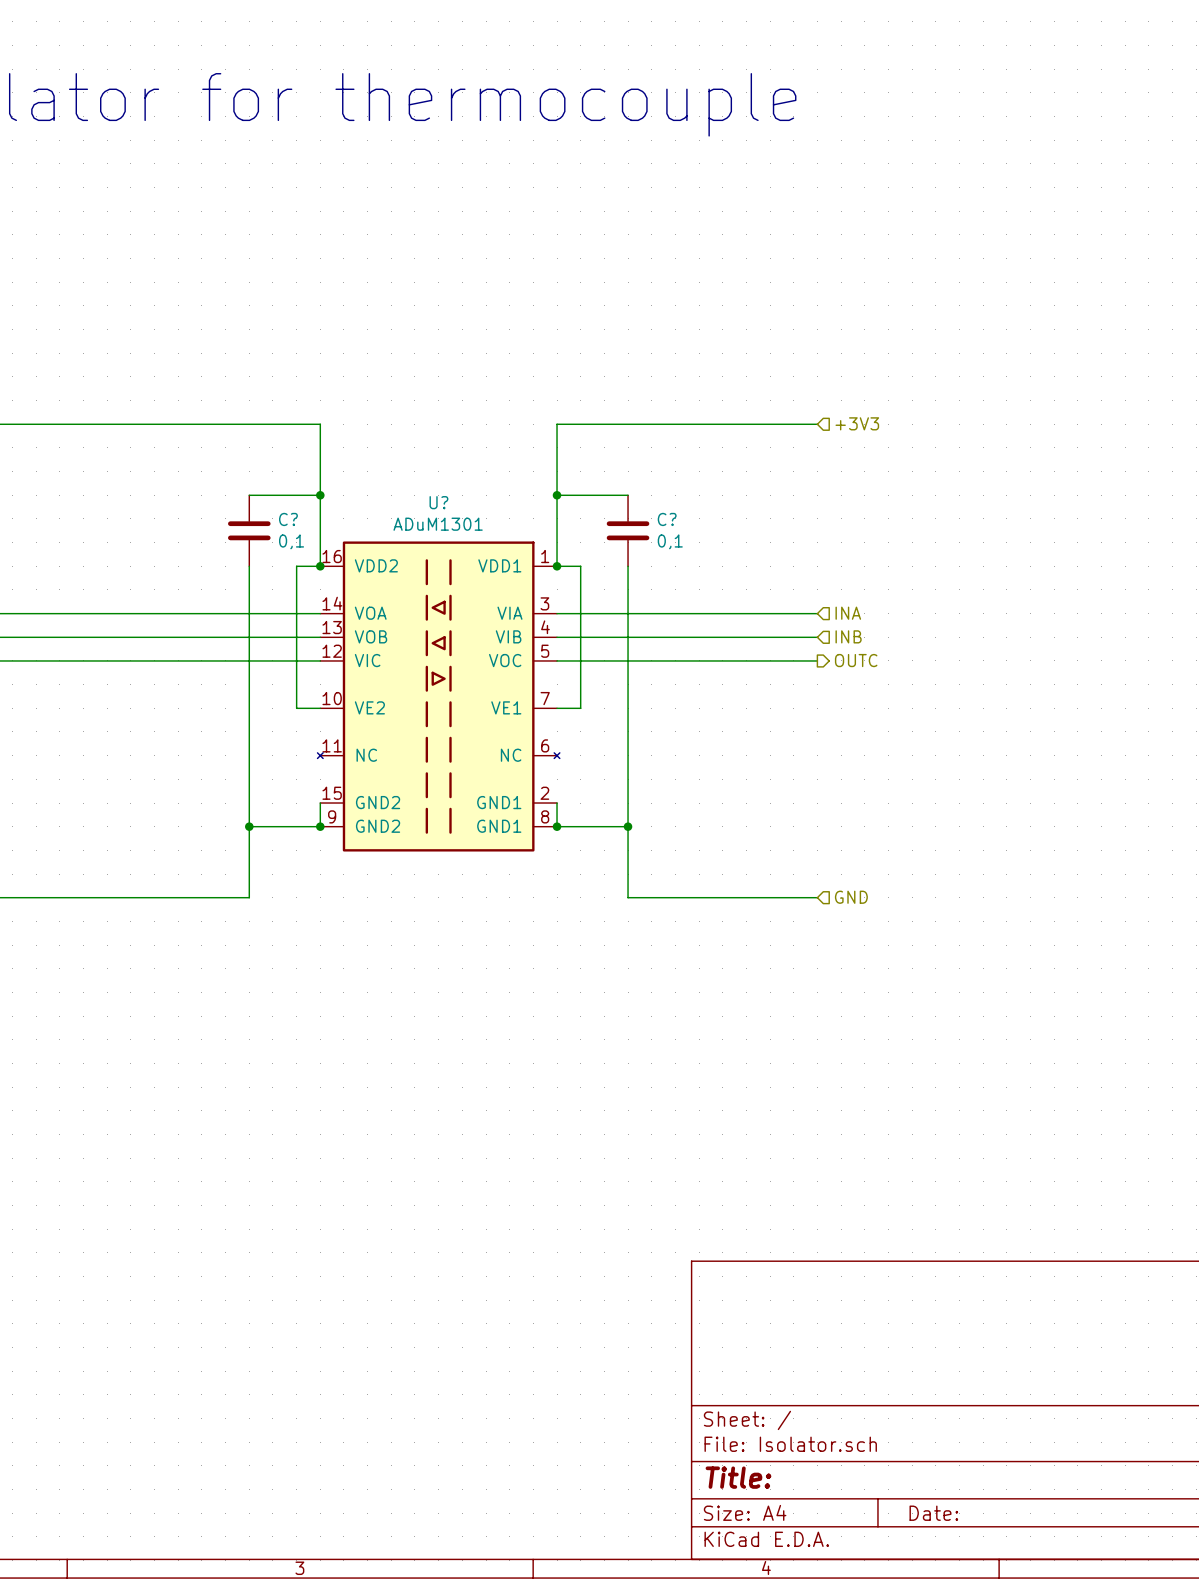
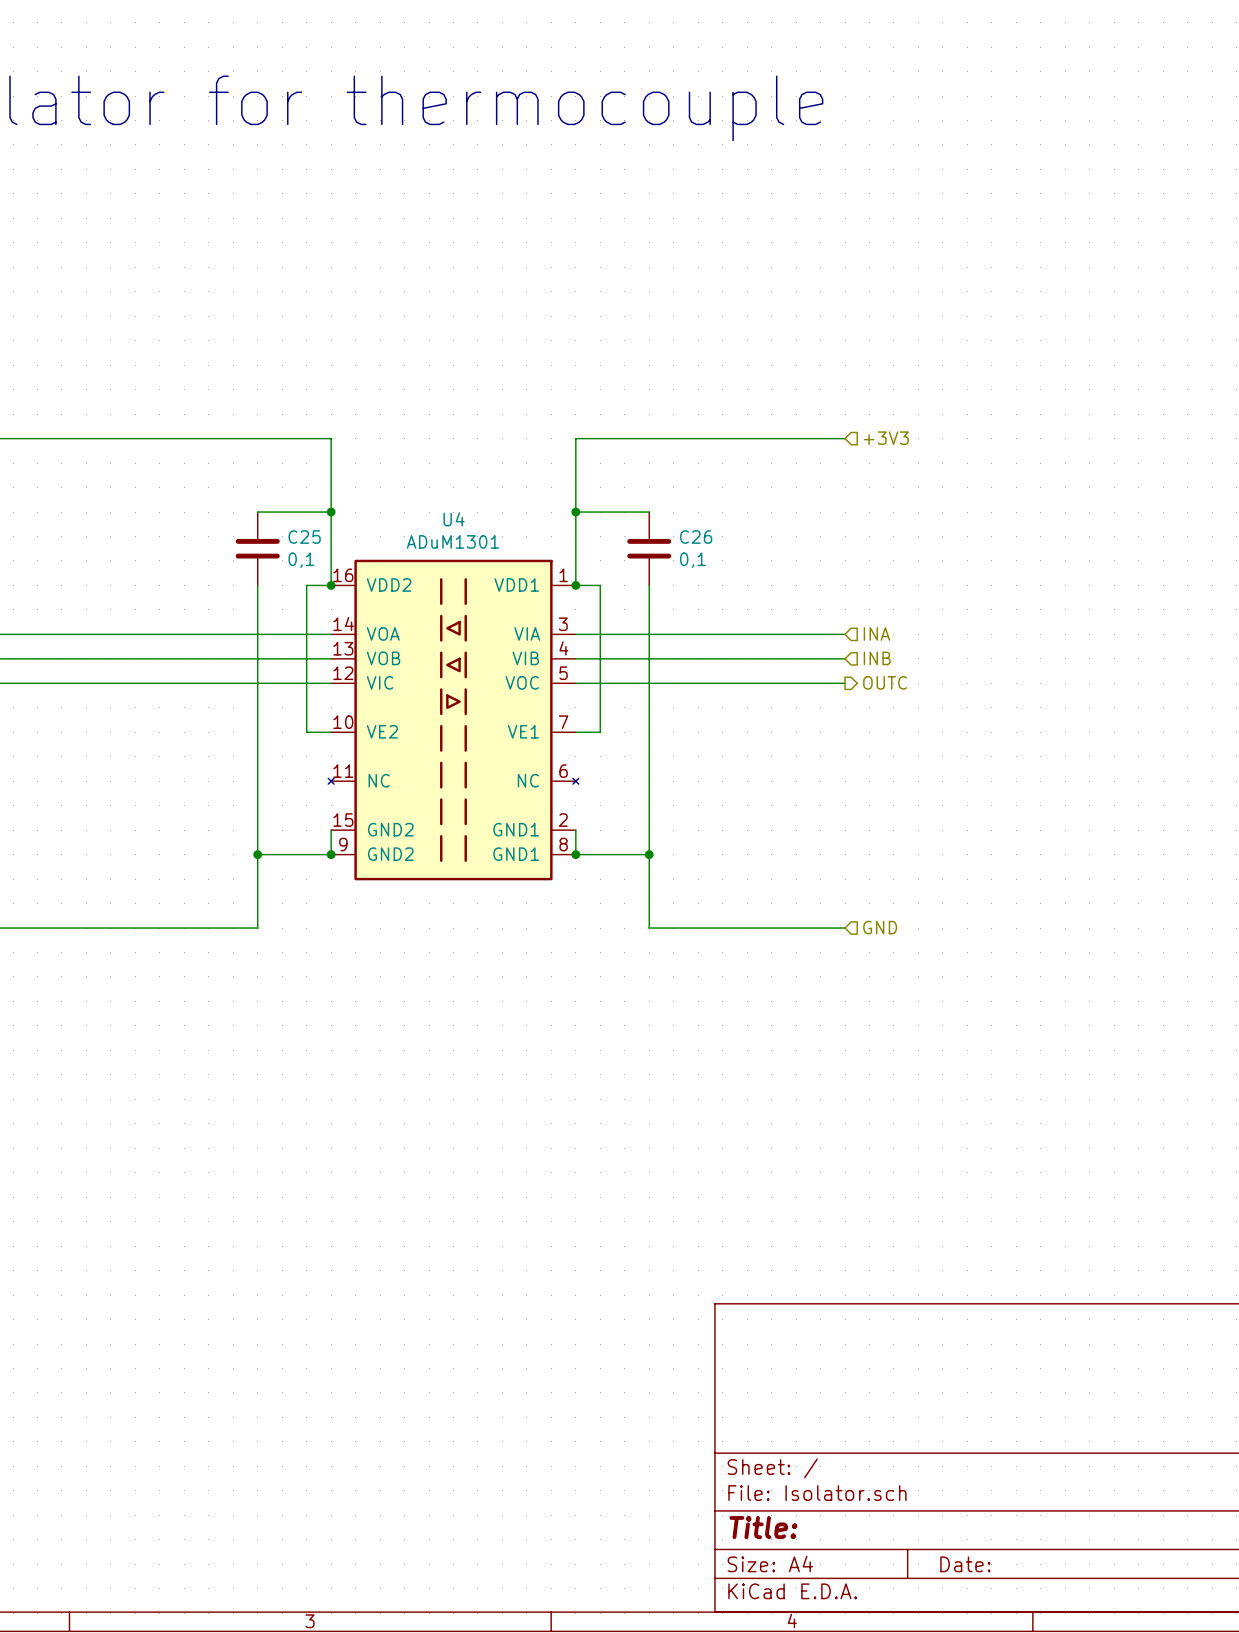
U? name: U? (438, 502) -> U4 (454, 519)
C? name: C? (288, 519) -> C25 (304, 537)
C? name: C? (667, 519) -> C26 (696, 537)

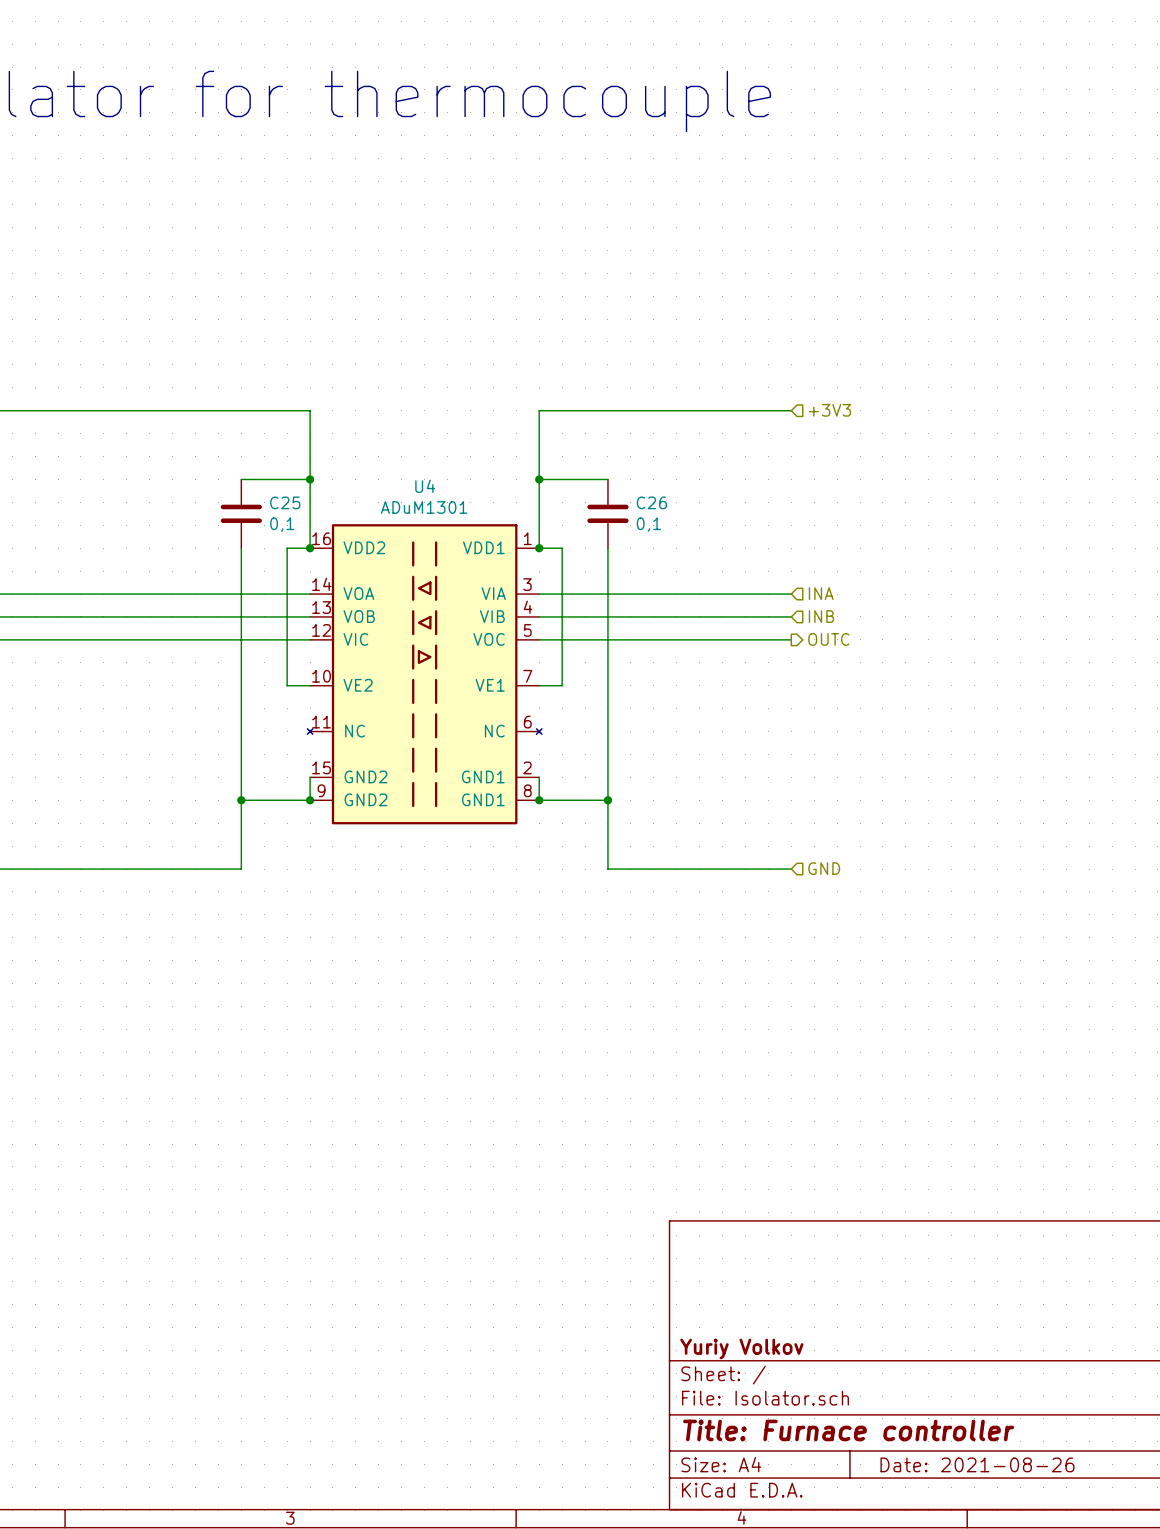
title block: none -> Yuriy Volkov (741, 1348)
title block: Title: (763, 1527) -> Title: Furnace controller (848, 1430)
title block: Date: (965, 1564) -> Date: 2021-08-26 (977, 1464)

